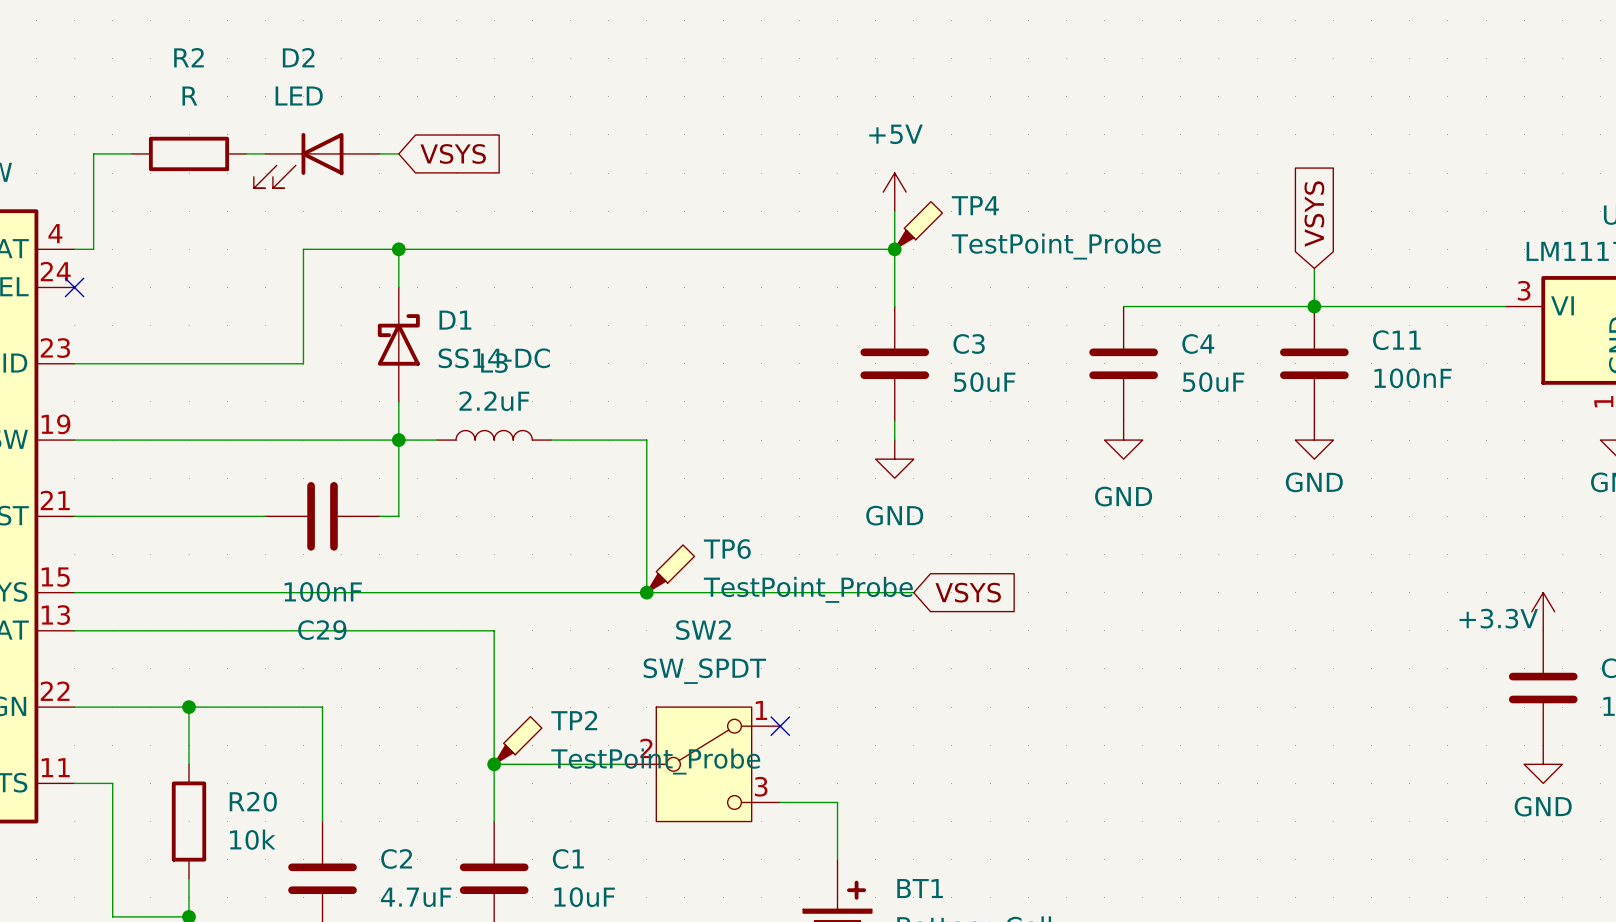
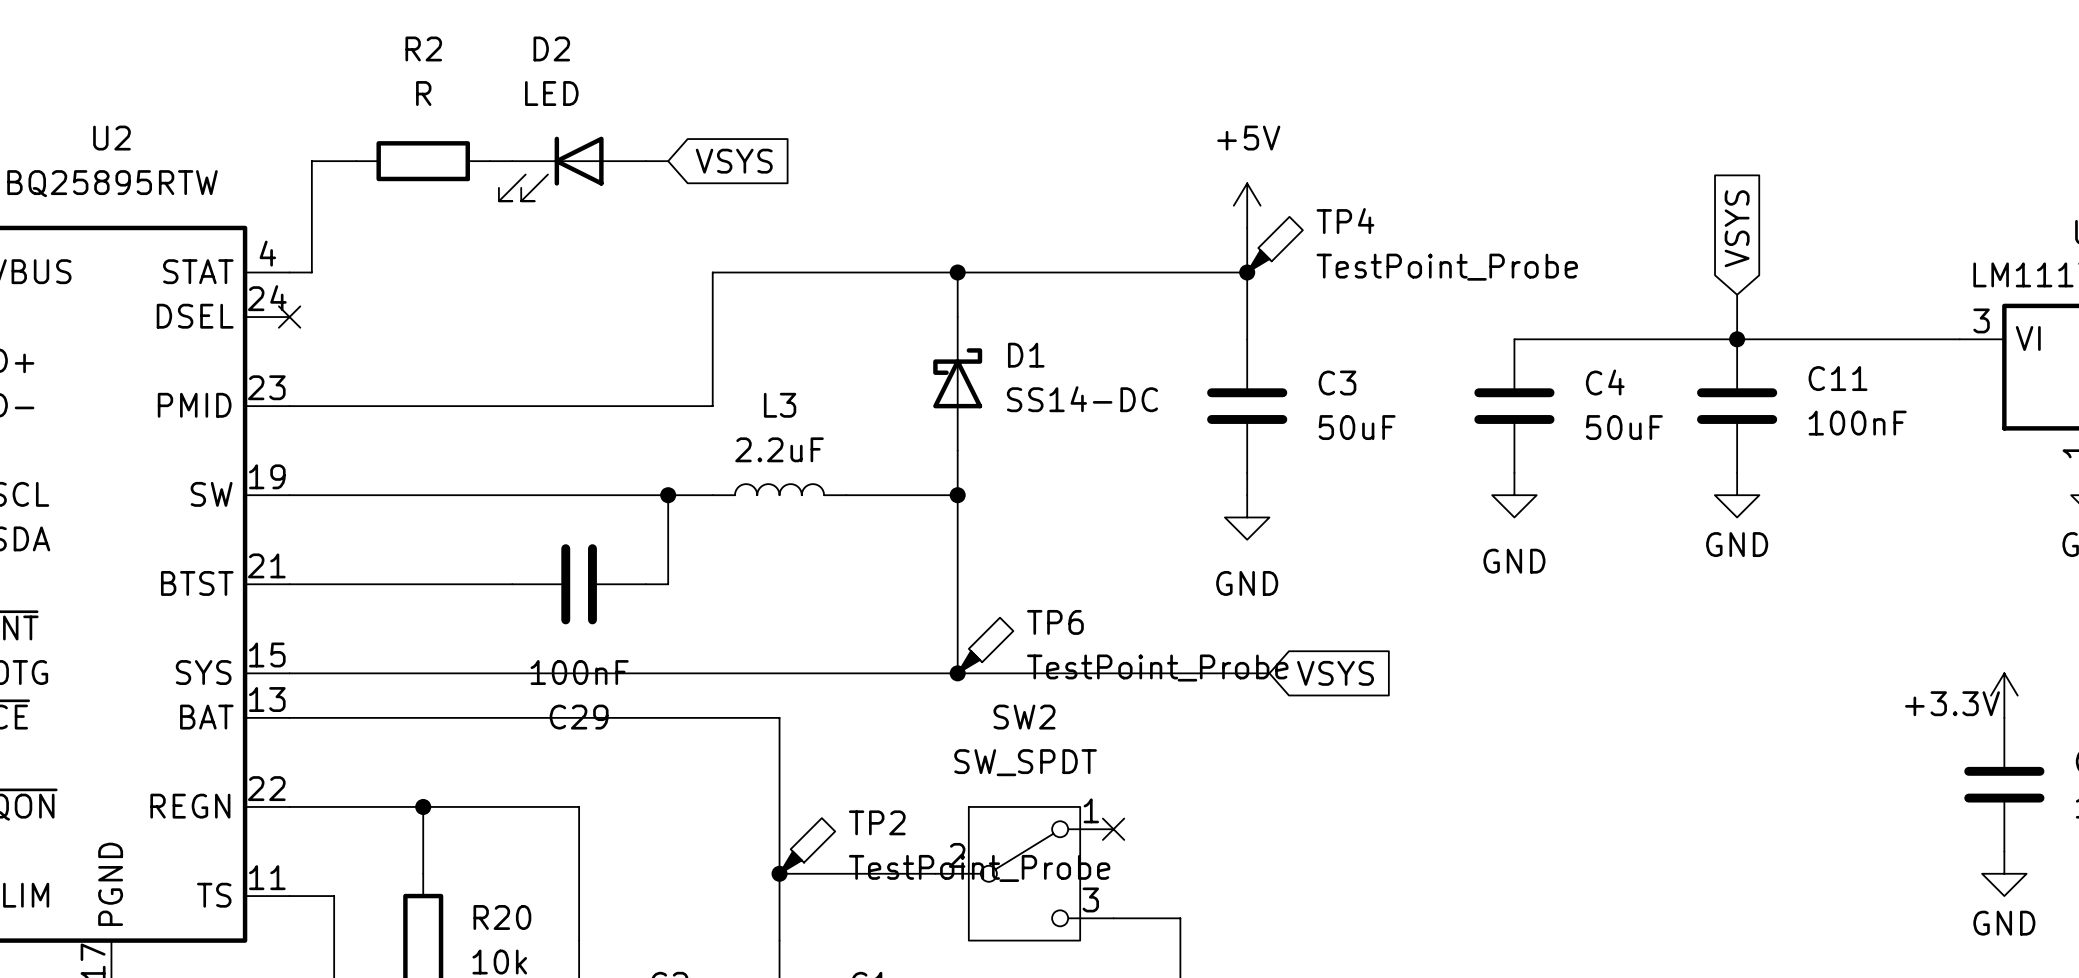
wire: (398, 249) (398, 287) -> (957, 272) (957, 317)
junction: (398, 249) -> none
wire: (436, 249) (303, 249) (303, 363) -> (712, 272) (712, 406) (556, 406)
junction: none -> (957, 272)
D1 position: (398, 344) -> (957, 383)
wire: (398, 401) (398, 440) -> (957, 450) (957, 495)
junction: none -> (957, 495)

